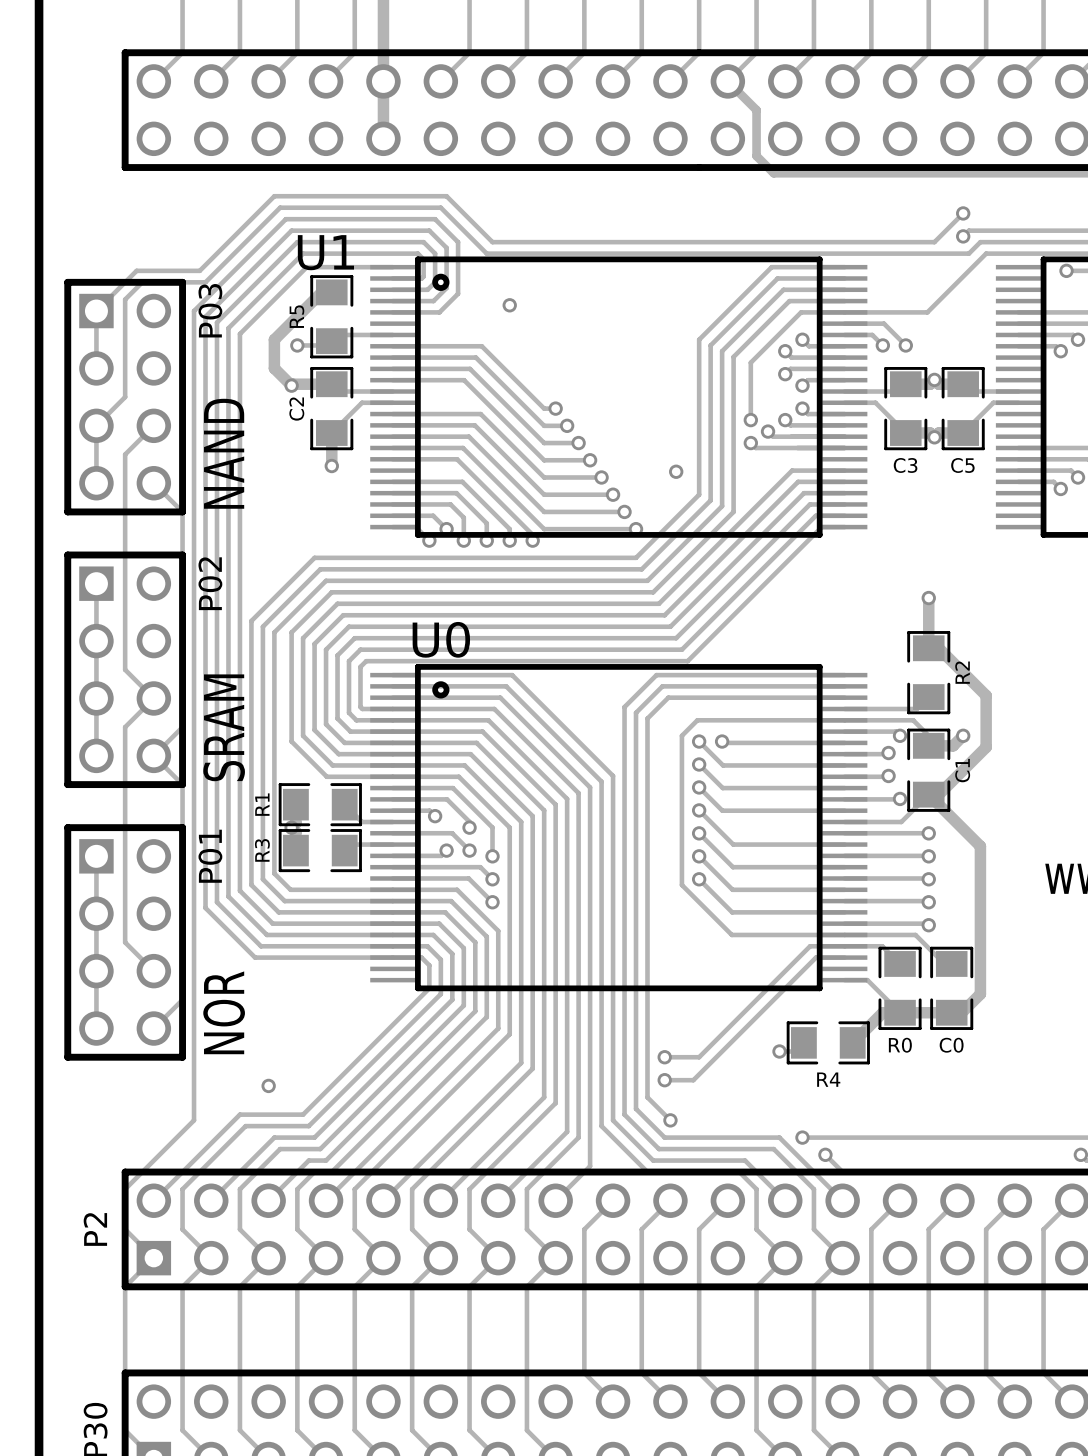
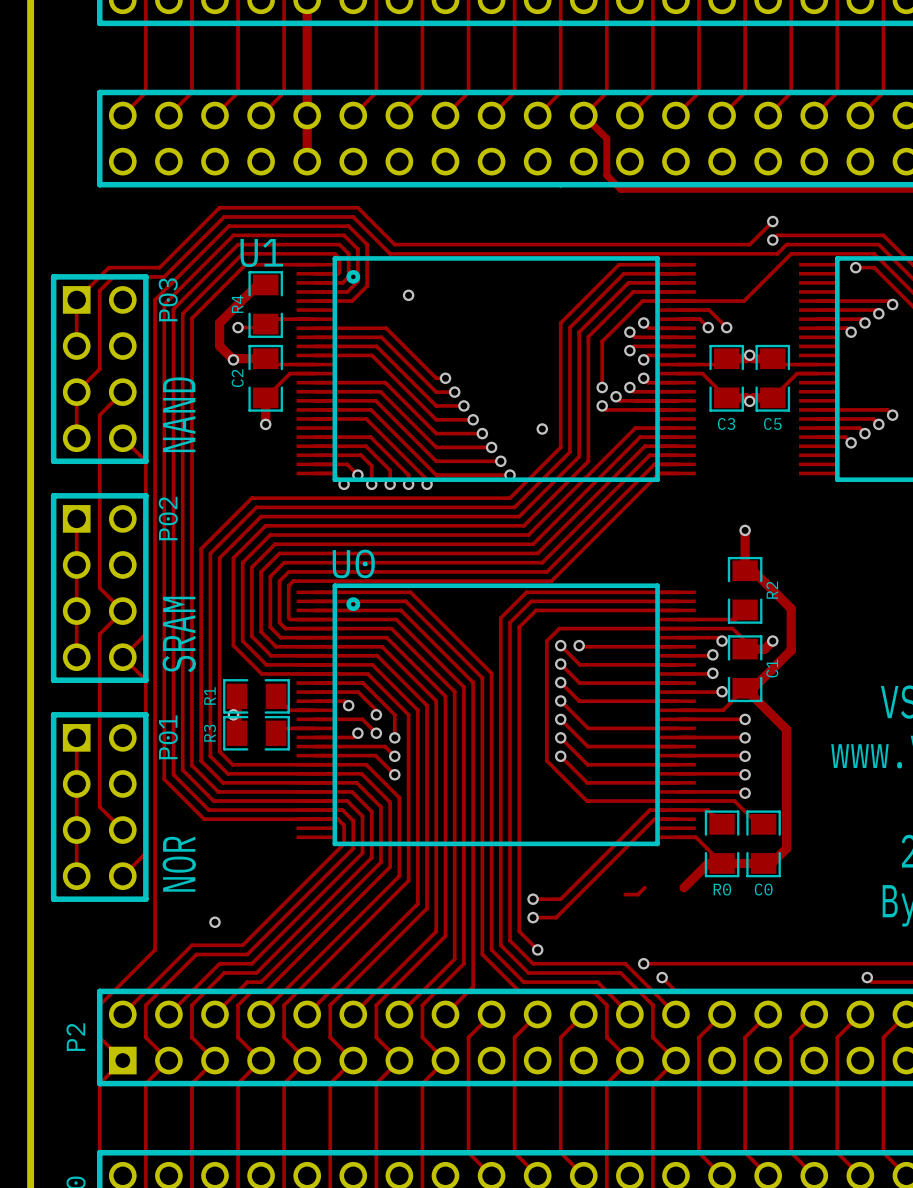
R5 name: R5 (296, 316) -> R4 (237, 304)
R4: (828, 1042) -> none
via: (779, 1051) -> none

